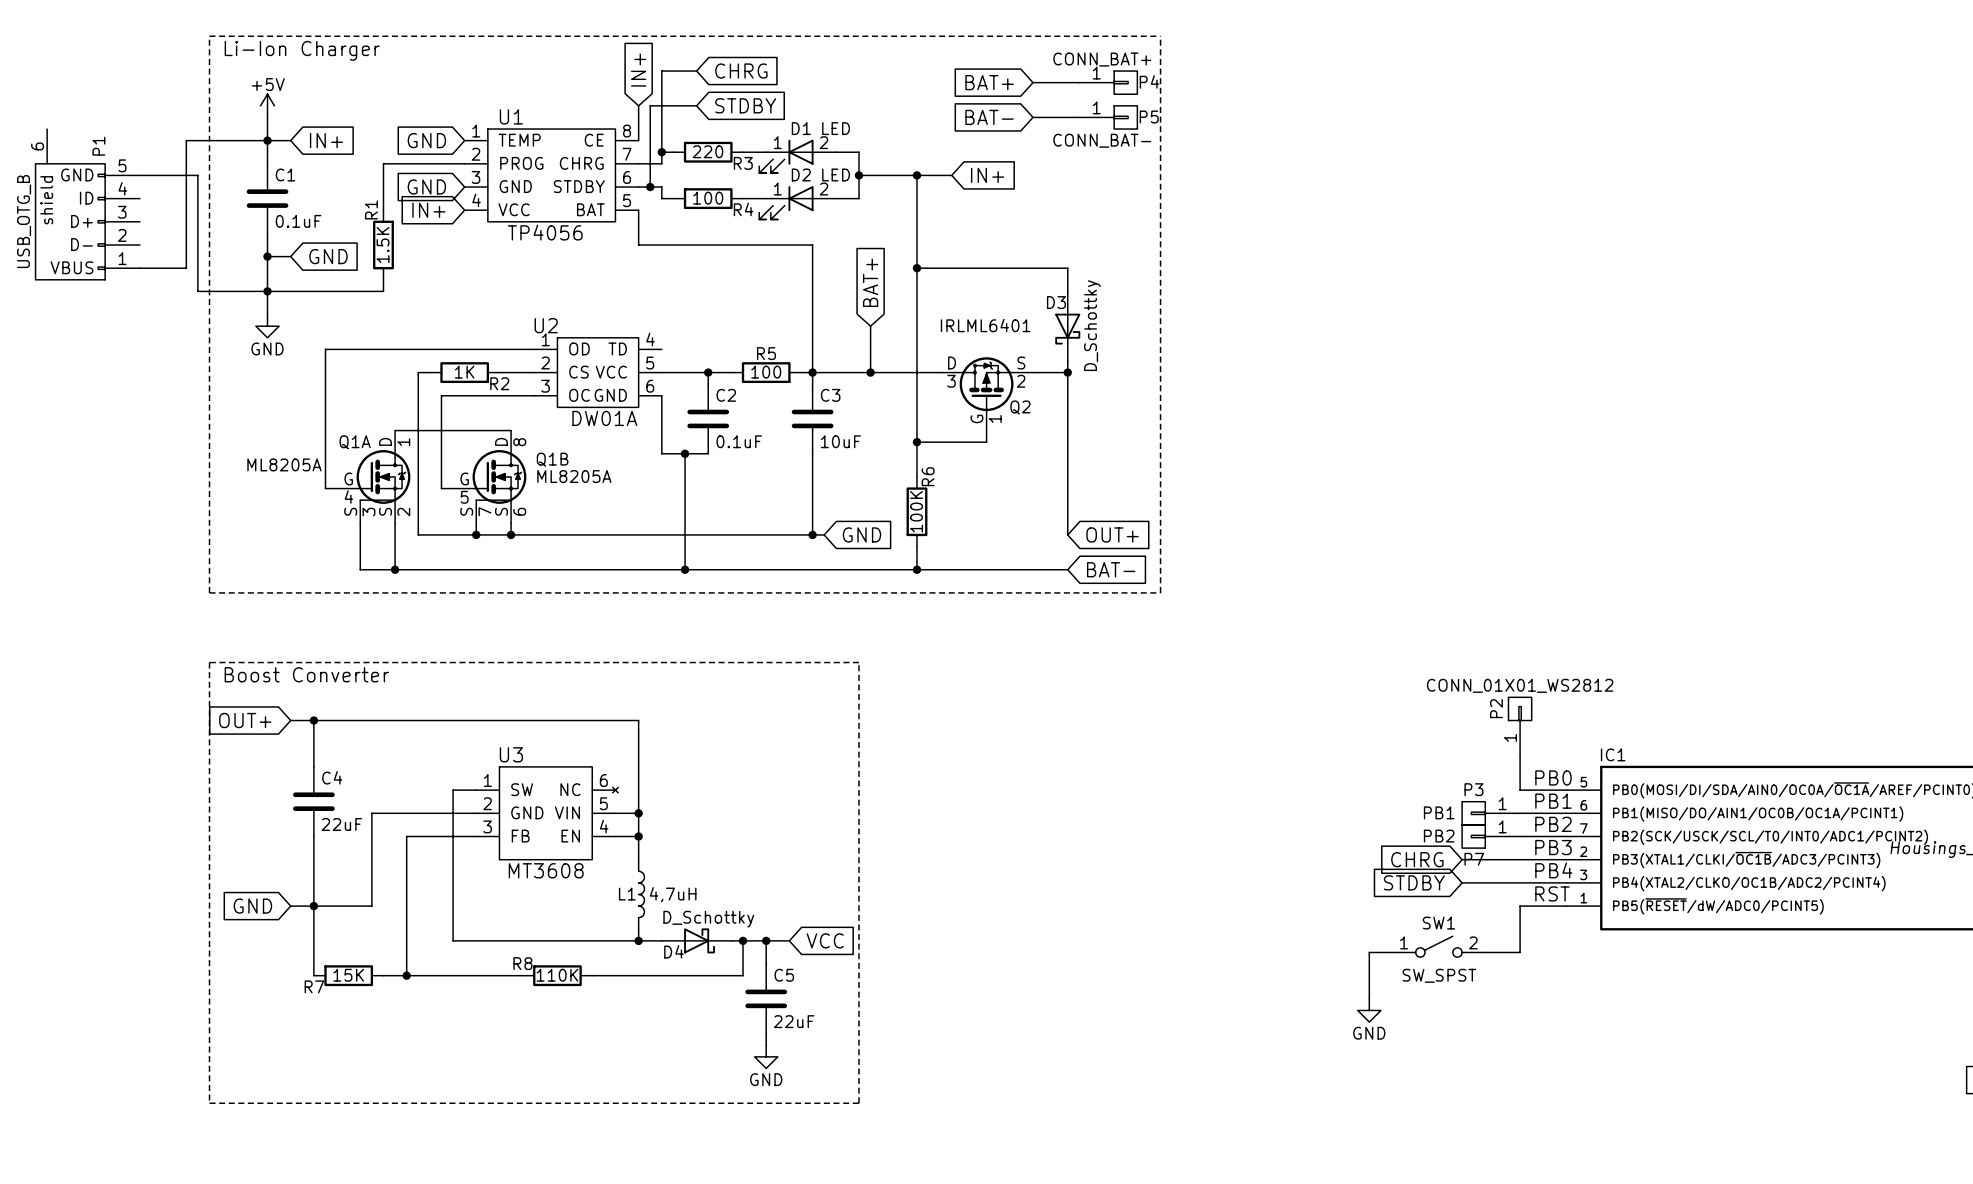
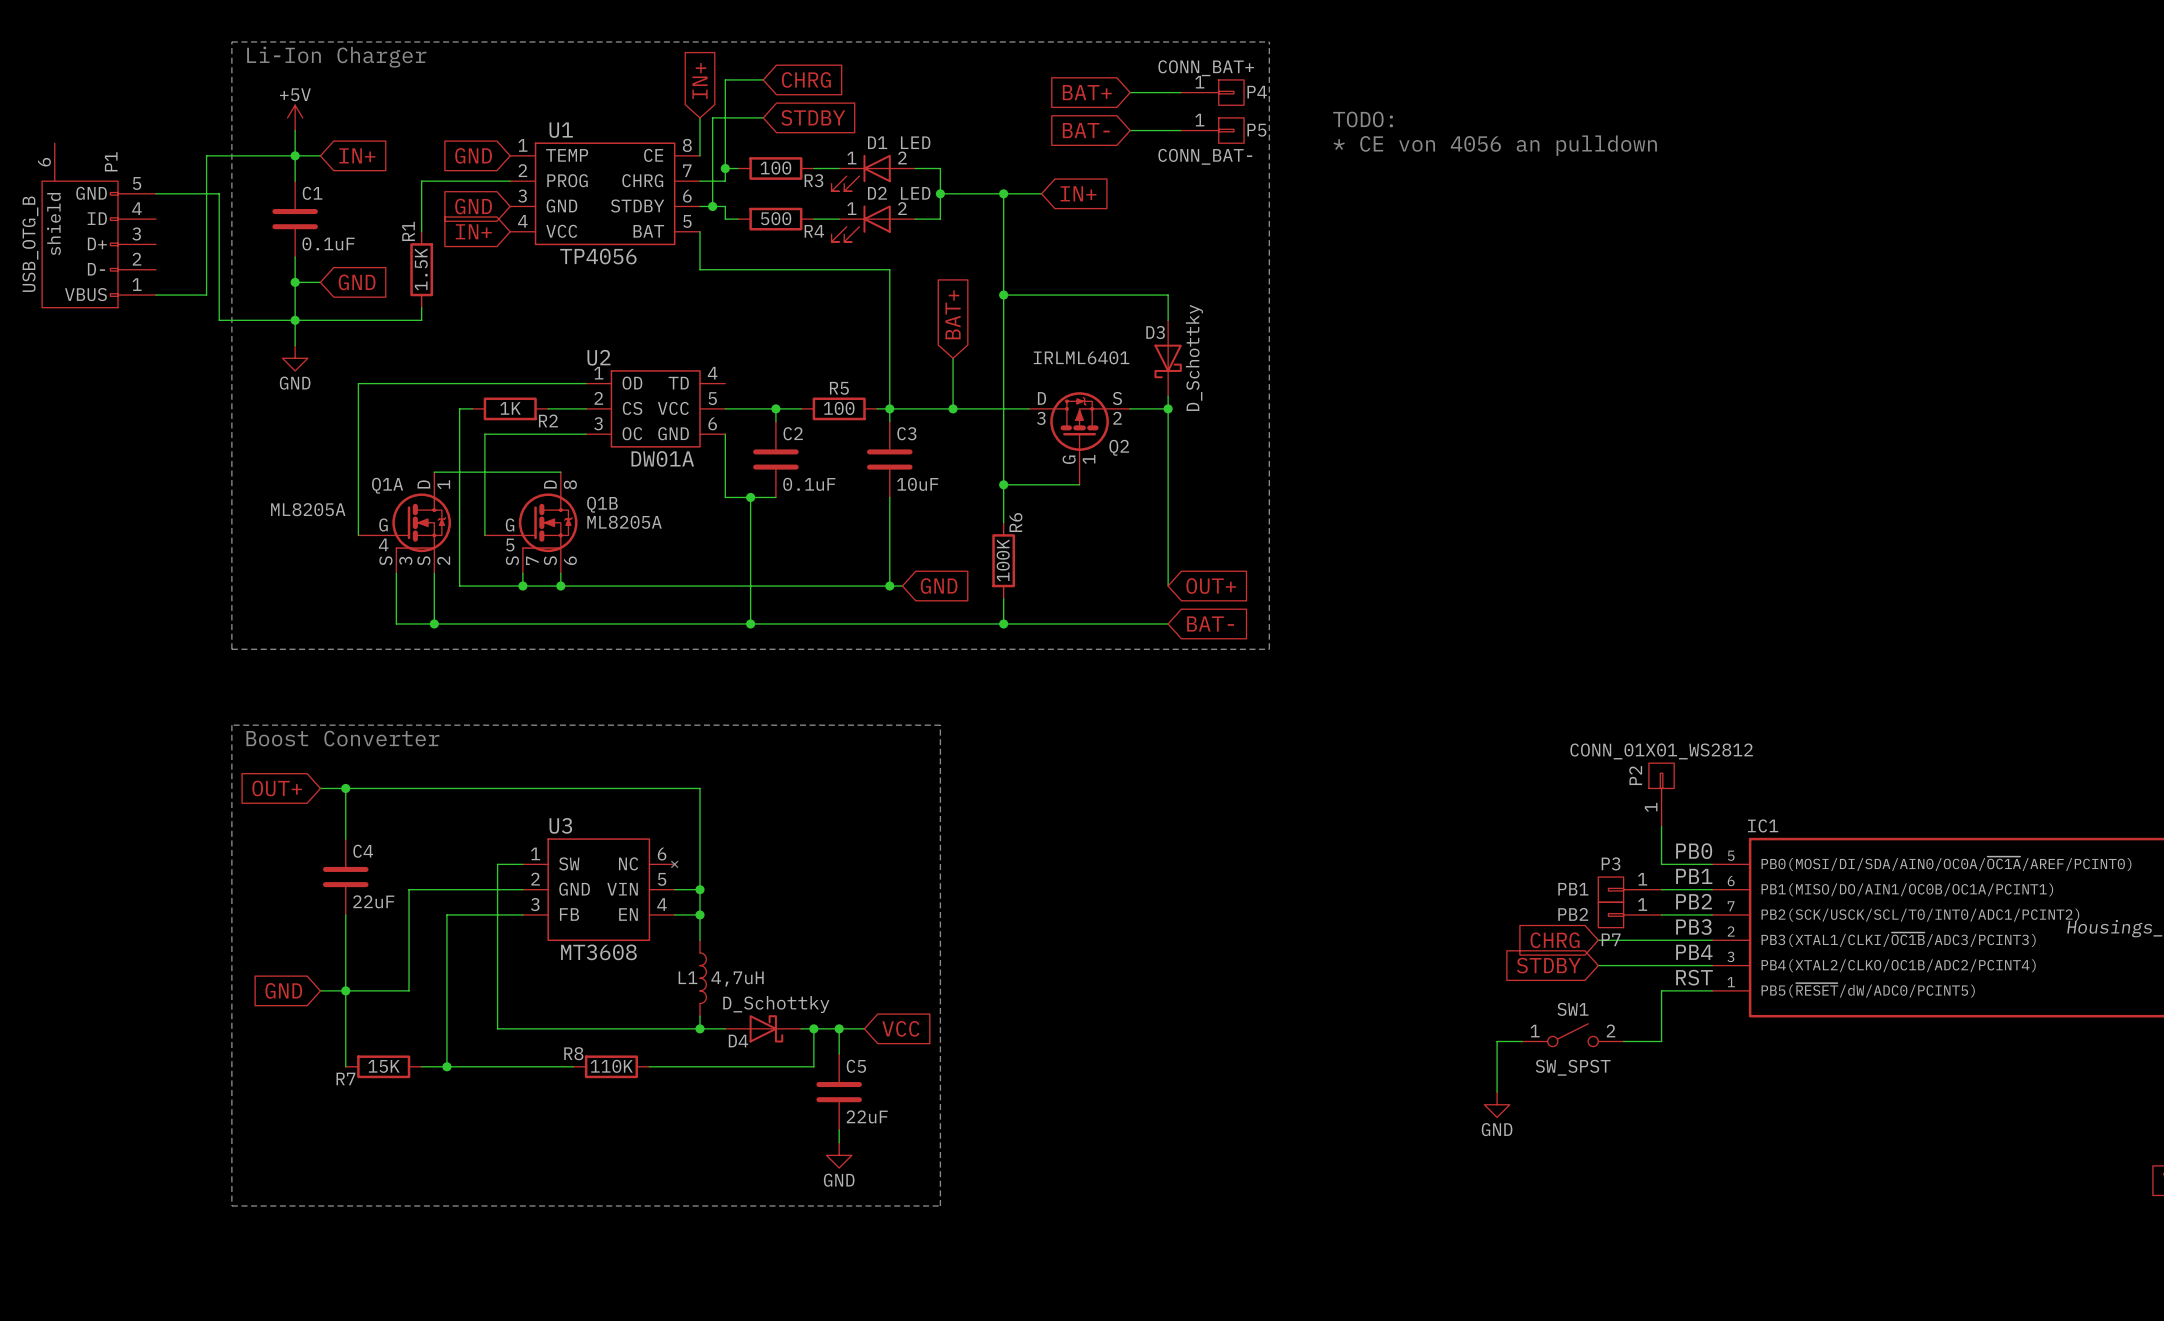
text: none -> TODO: (1363, 119)
text: none -> * CE von 4056 an pulldown (1495, 145)
R3 value: 220 (707, 151) -> 100 (775, 168)
R4 value: 100 (708, 198) -> 500 (776, 218)

